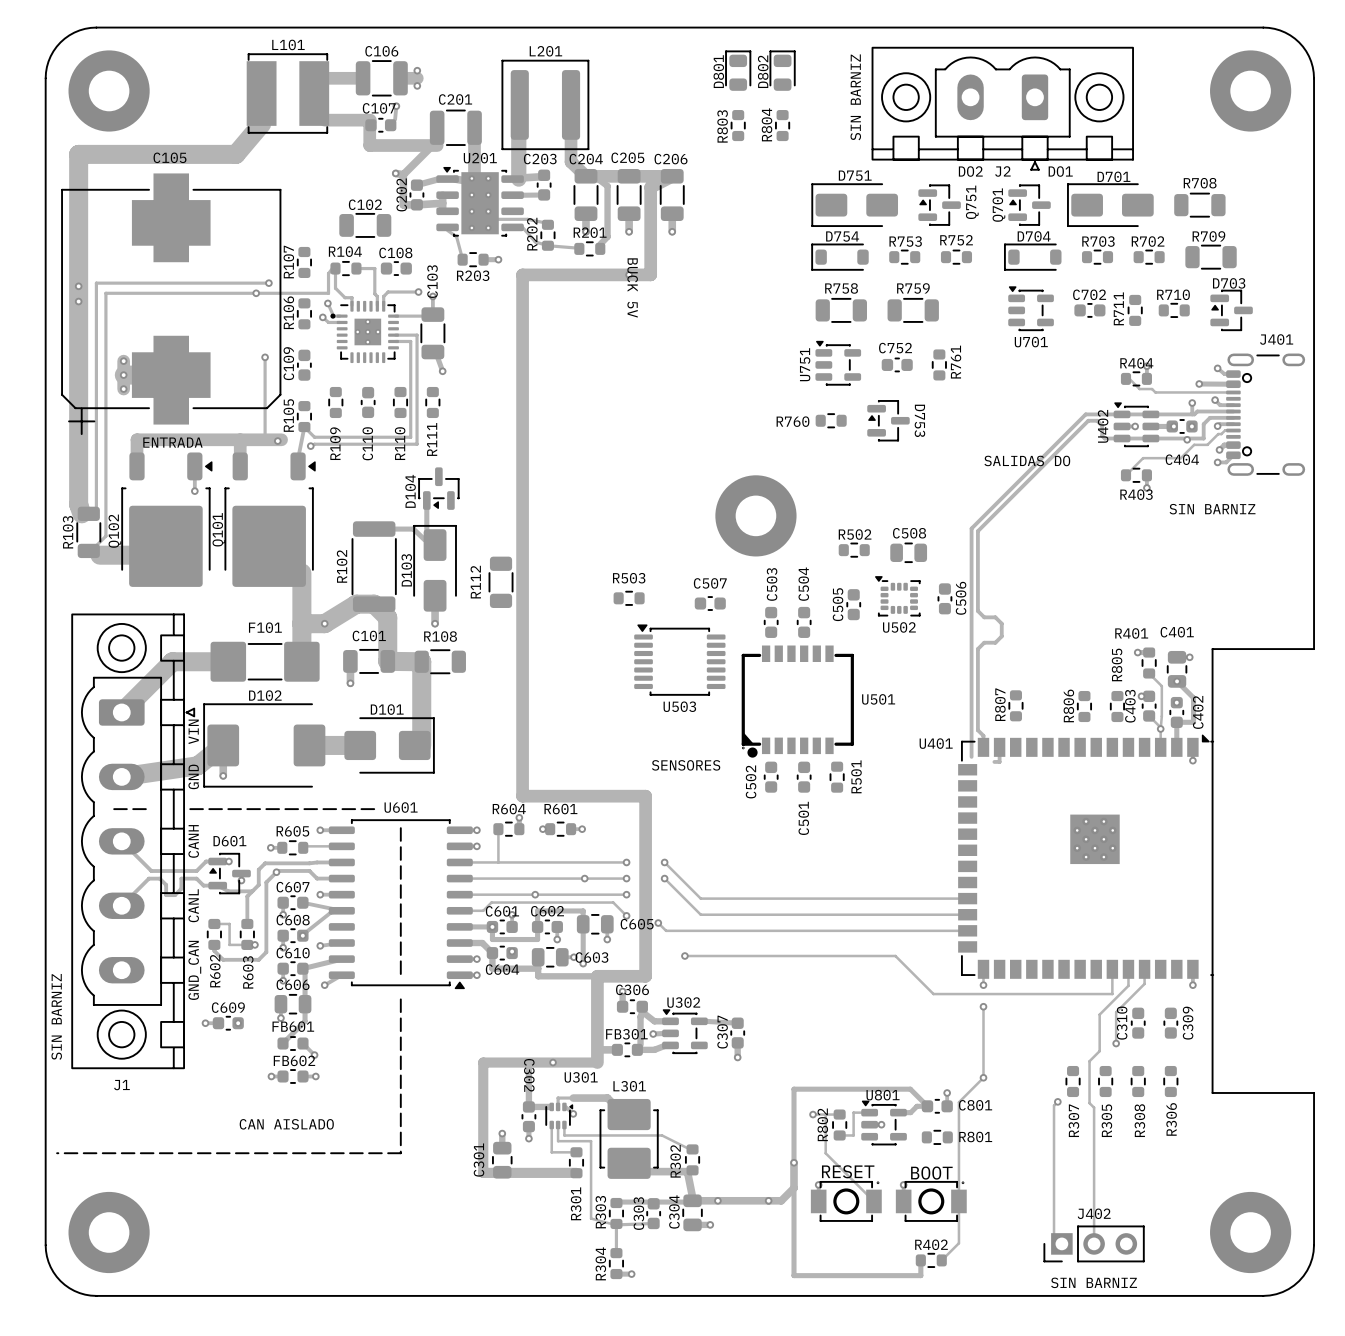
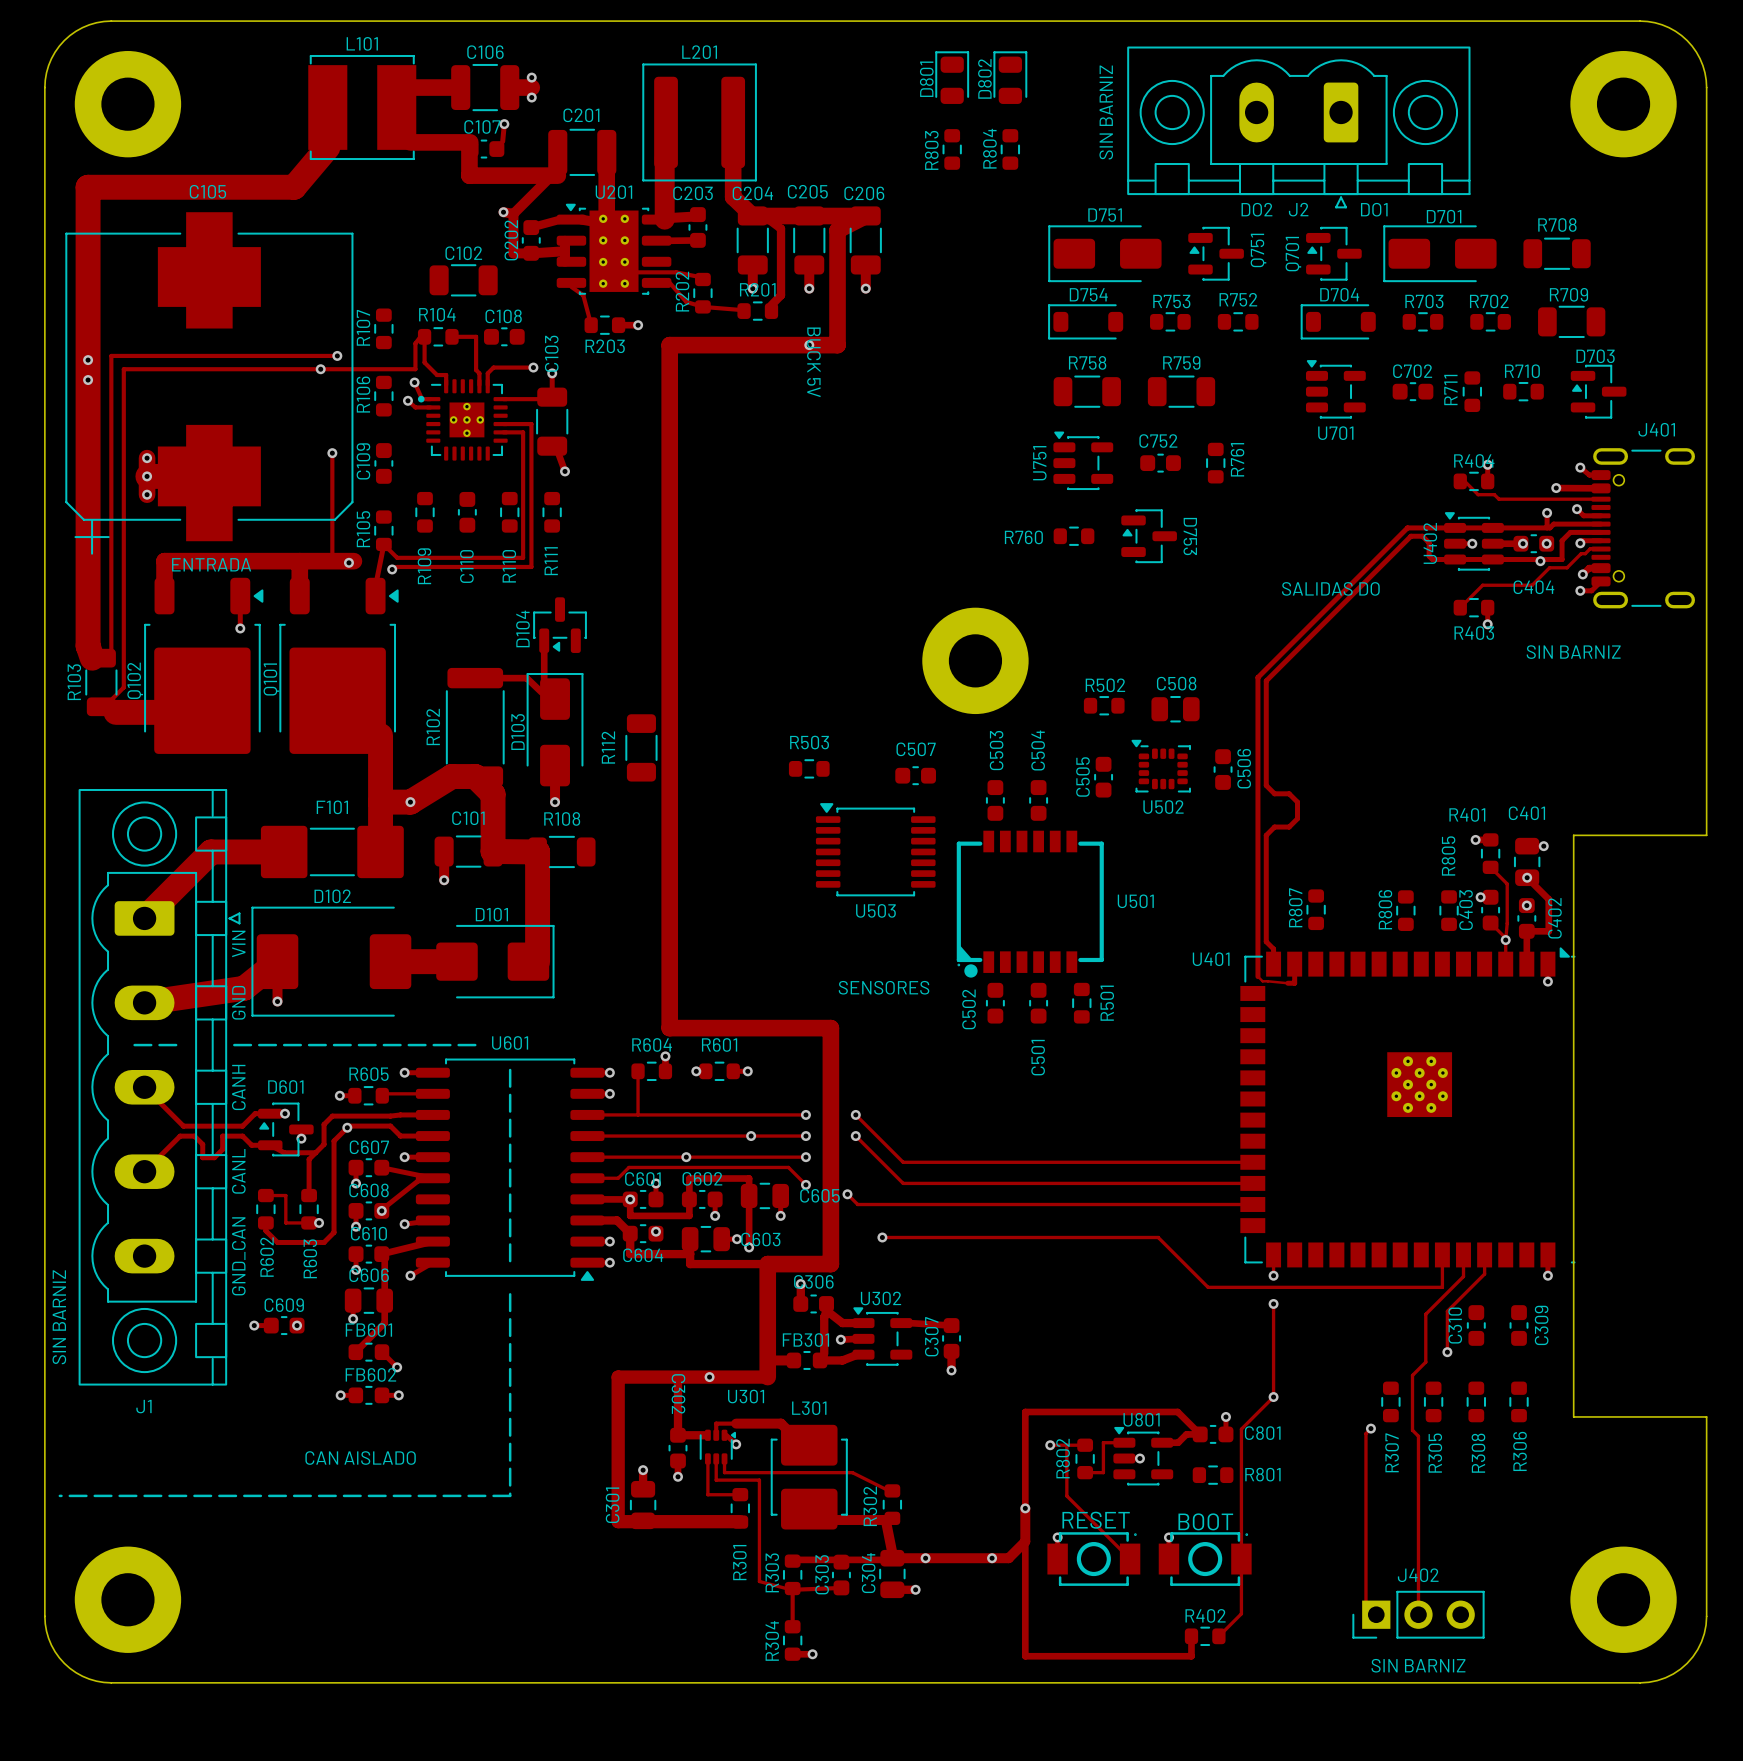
track: none -> (1257, 976) (1262, 981) (1287, 983)

